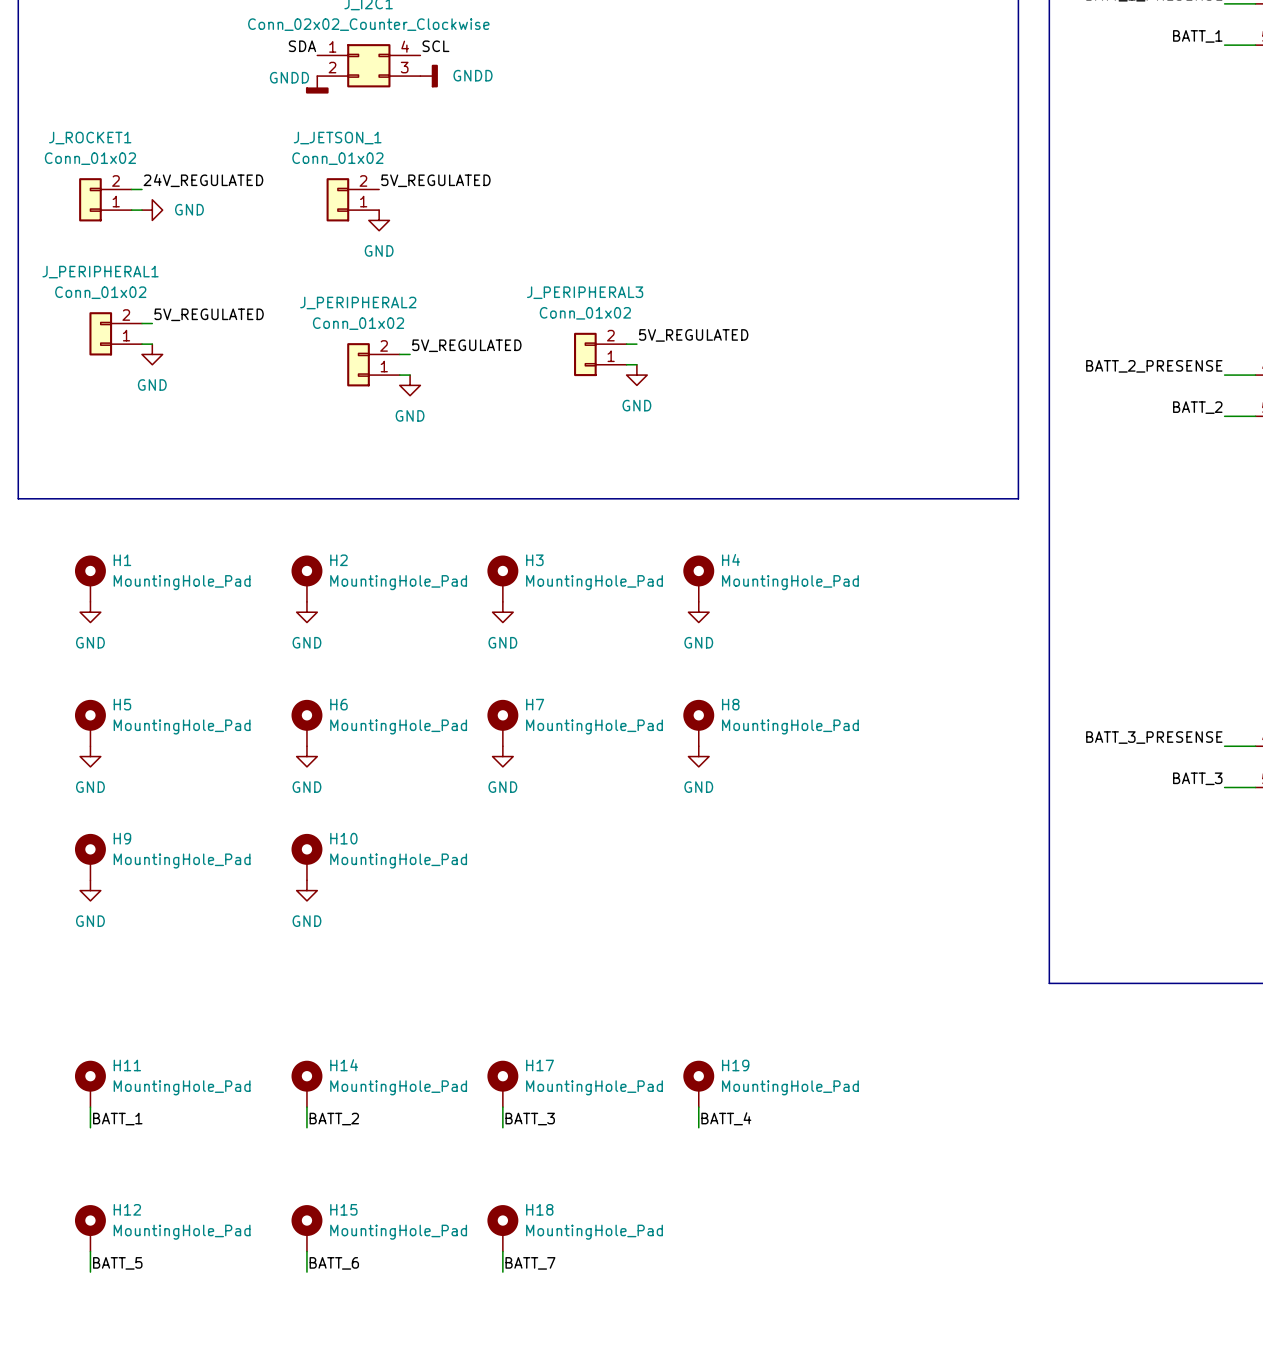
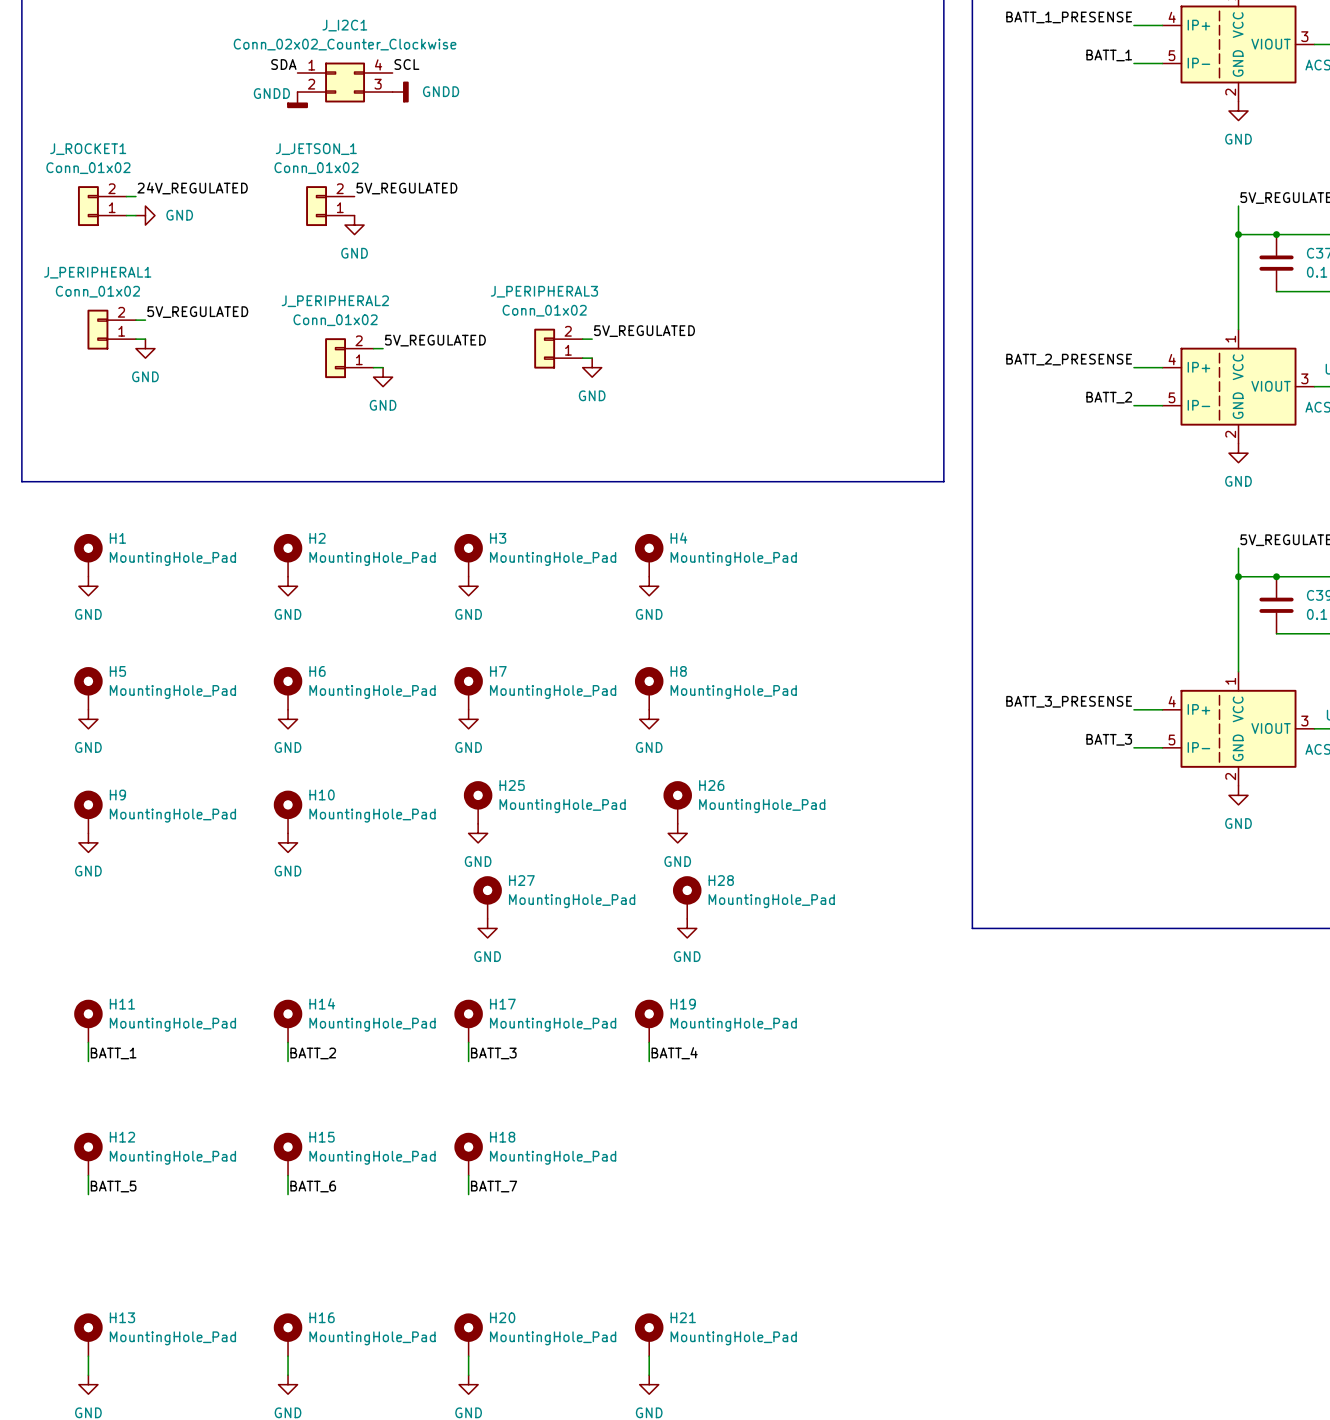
H25: none -> MountingHole_Pad (478, 802)
H26: none -> MountingHole_Pad (677, 802)
power symbol: none -> GND (478, 833)
power symbol: none -> GND (677, 833)
H27: none -> MountingHole_Pad (487, 897)
H28: none -> MountingHole_Pad (687, 897)
power symbol: none -> GND (487, 928)
power symbol: none -> GND (687, 928)

